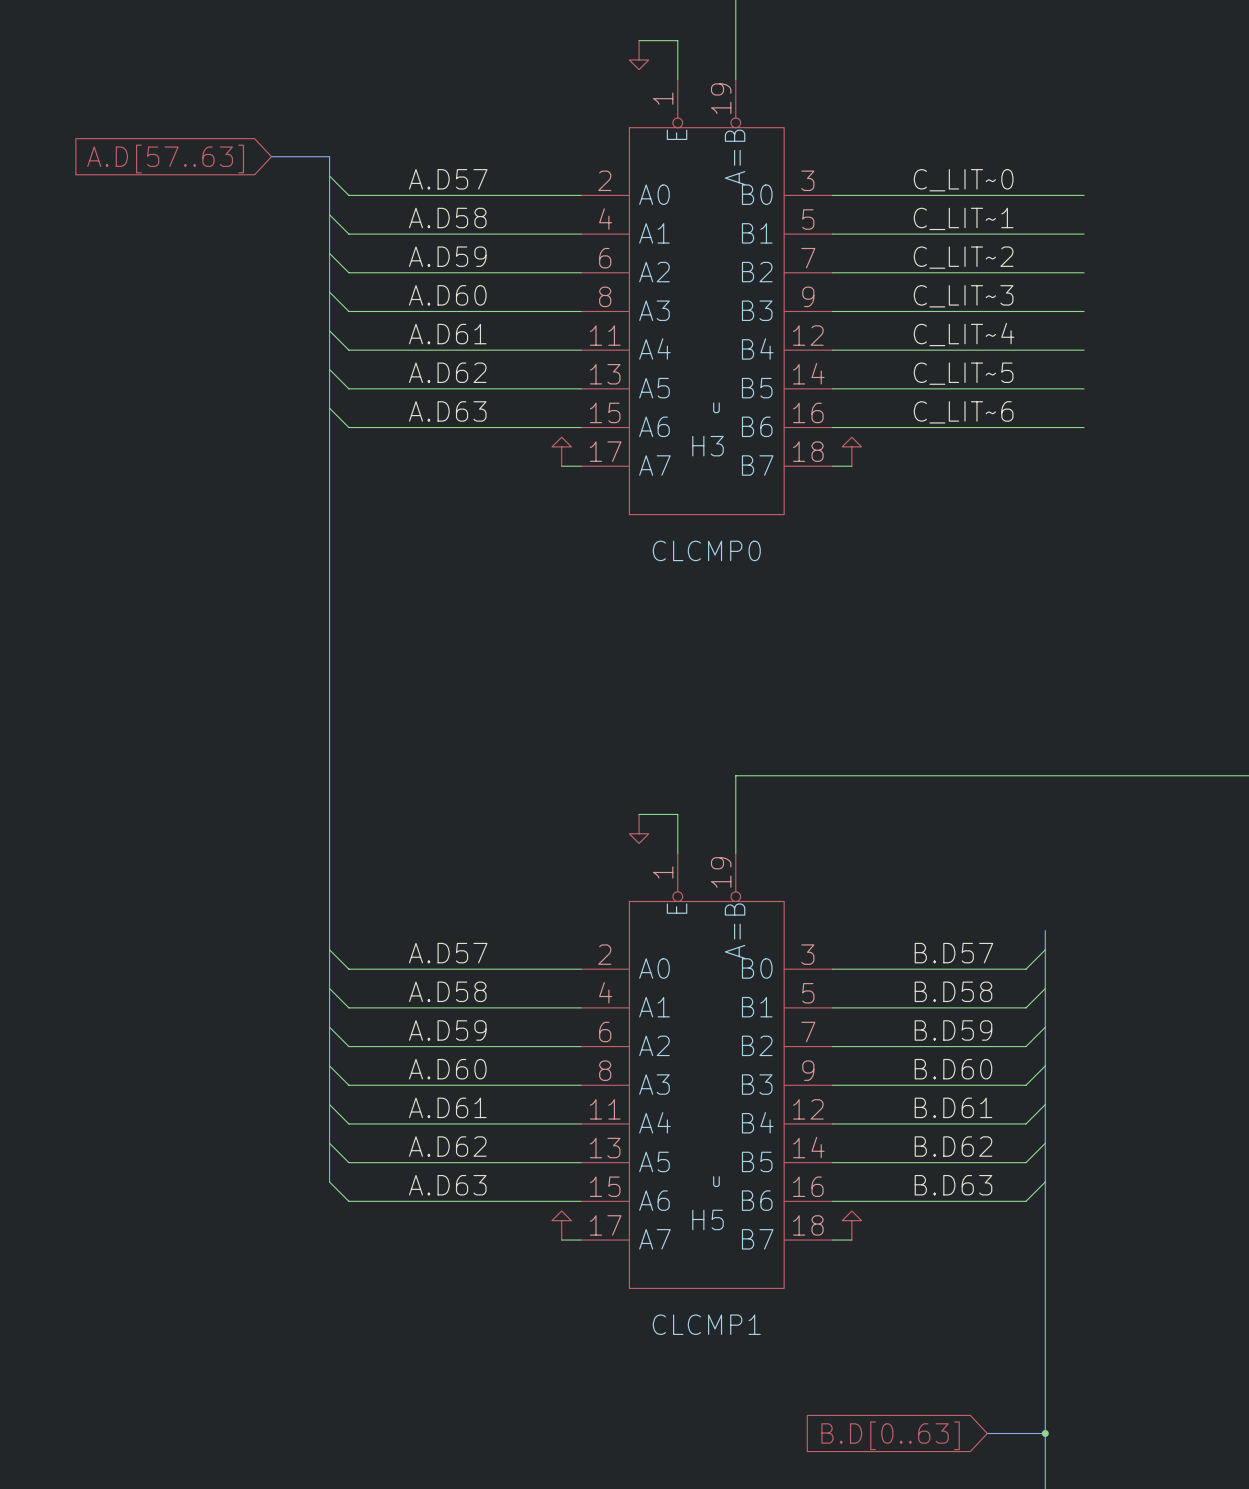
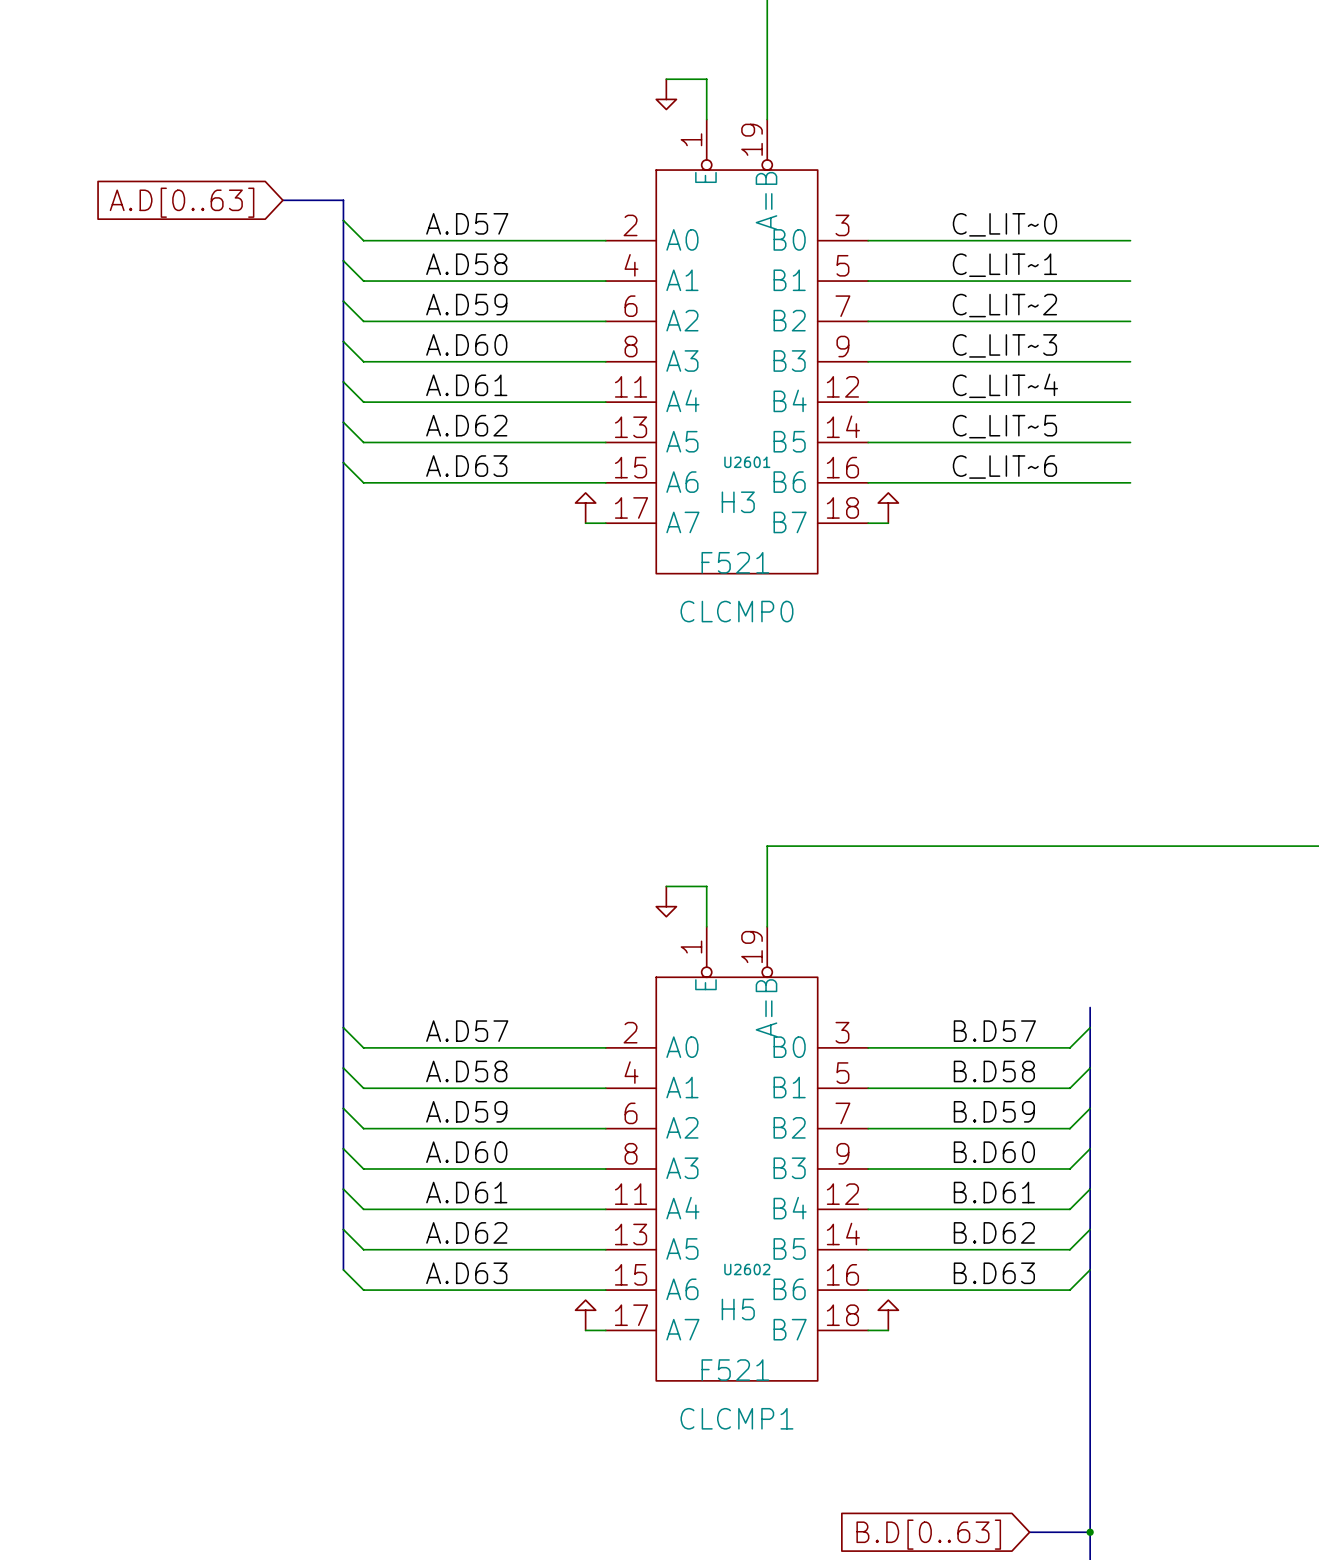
global label: A.D[57..63] (165, 159) -> A.D[0..63] (182, 202)
U name: U (716, 407) -> U2601 (747, 462)
U value: none -> F521 (735, 562)
U name: U (716, 1181) -> U2602 (747, 1269)
U value: none -> F521 (735, 1370)

